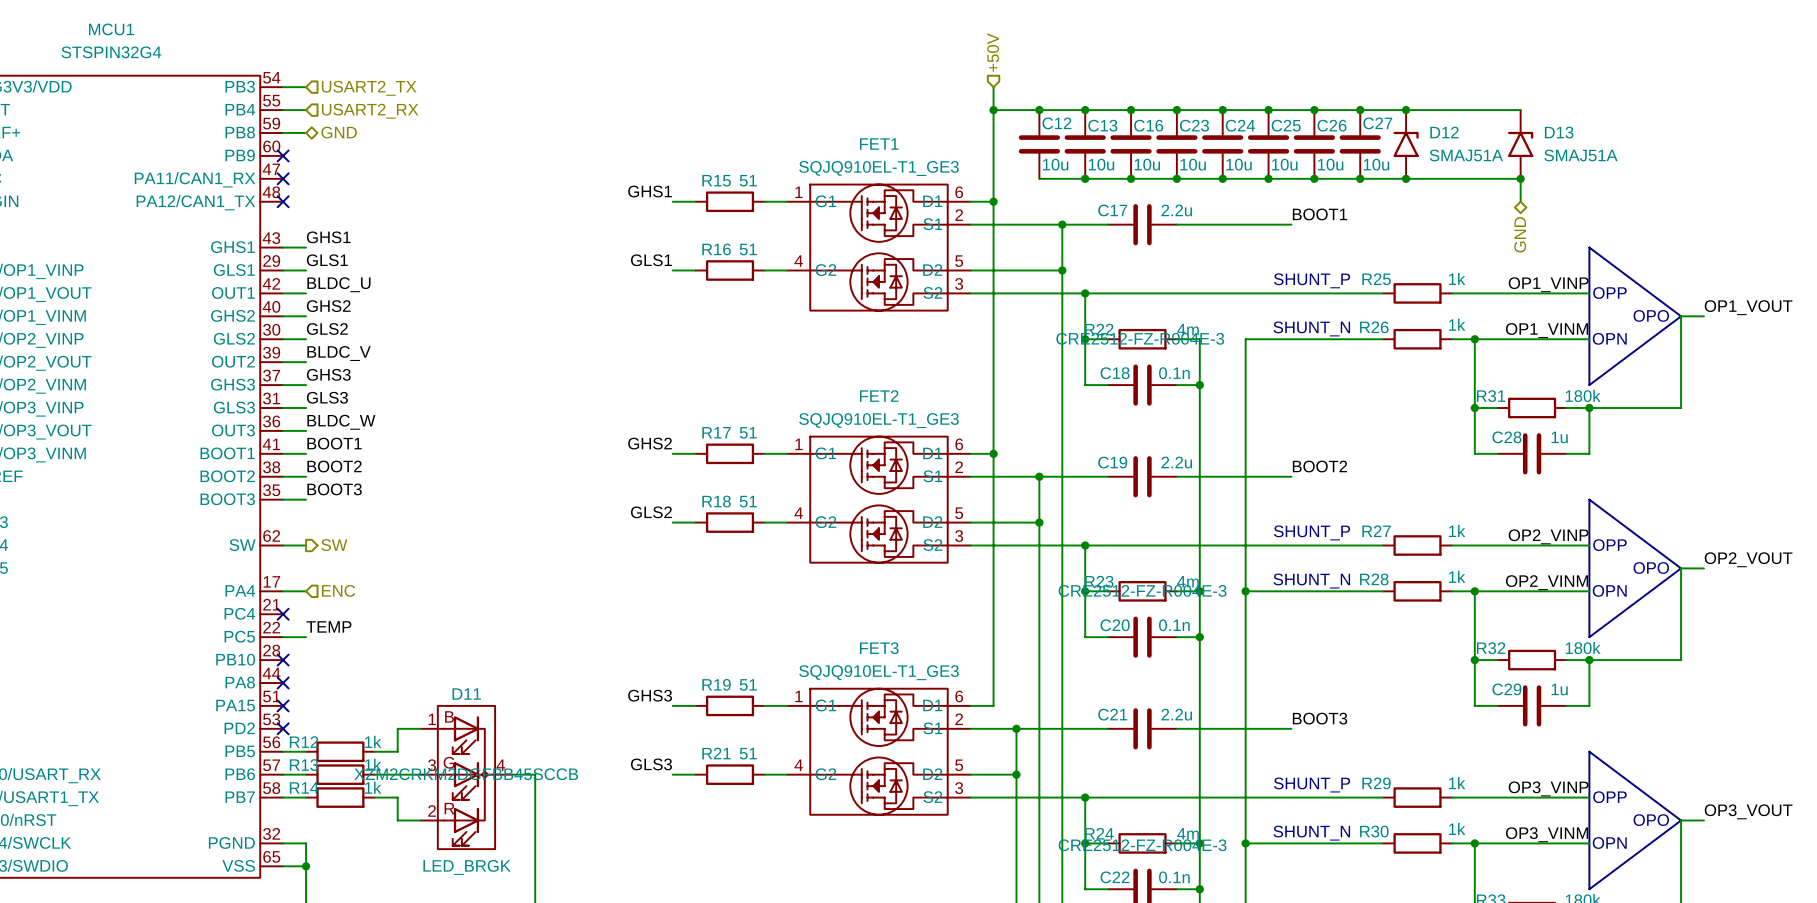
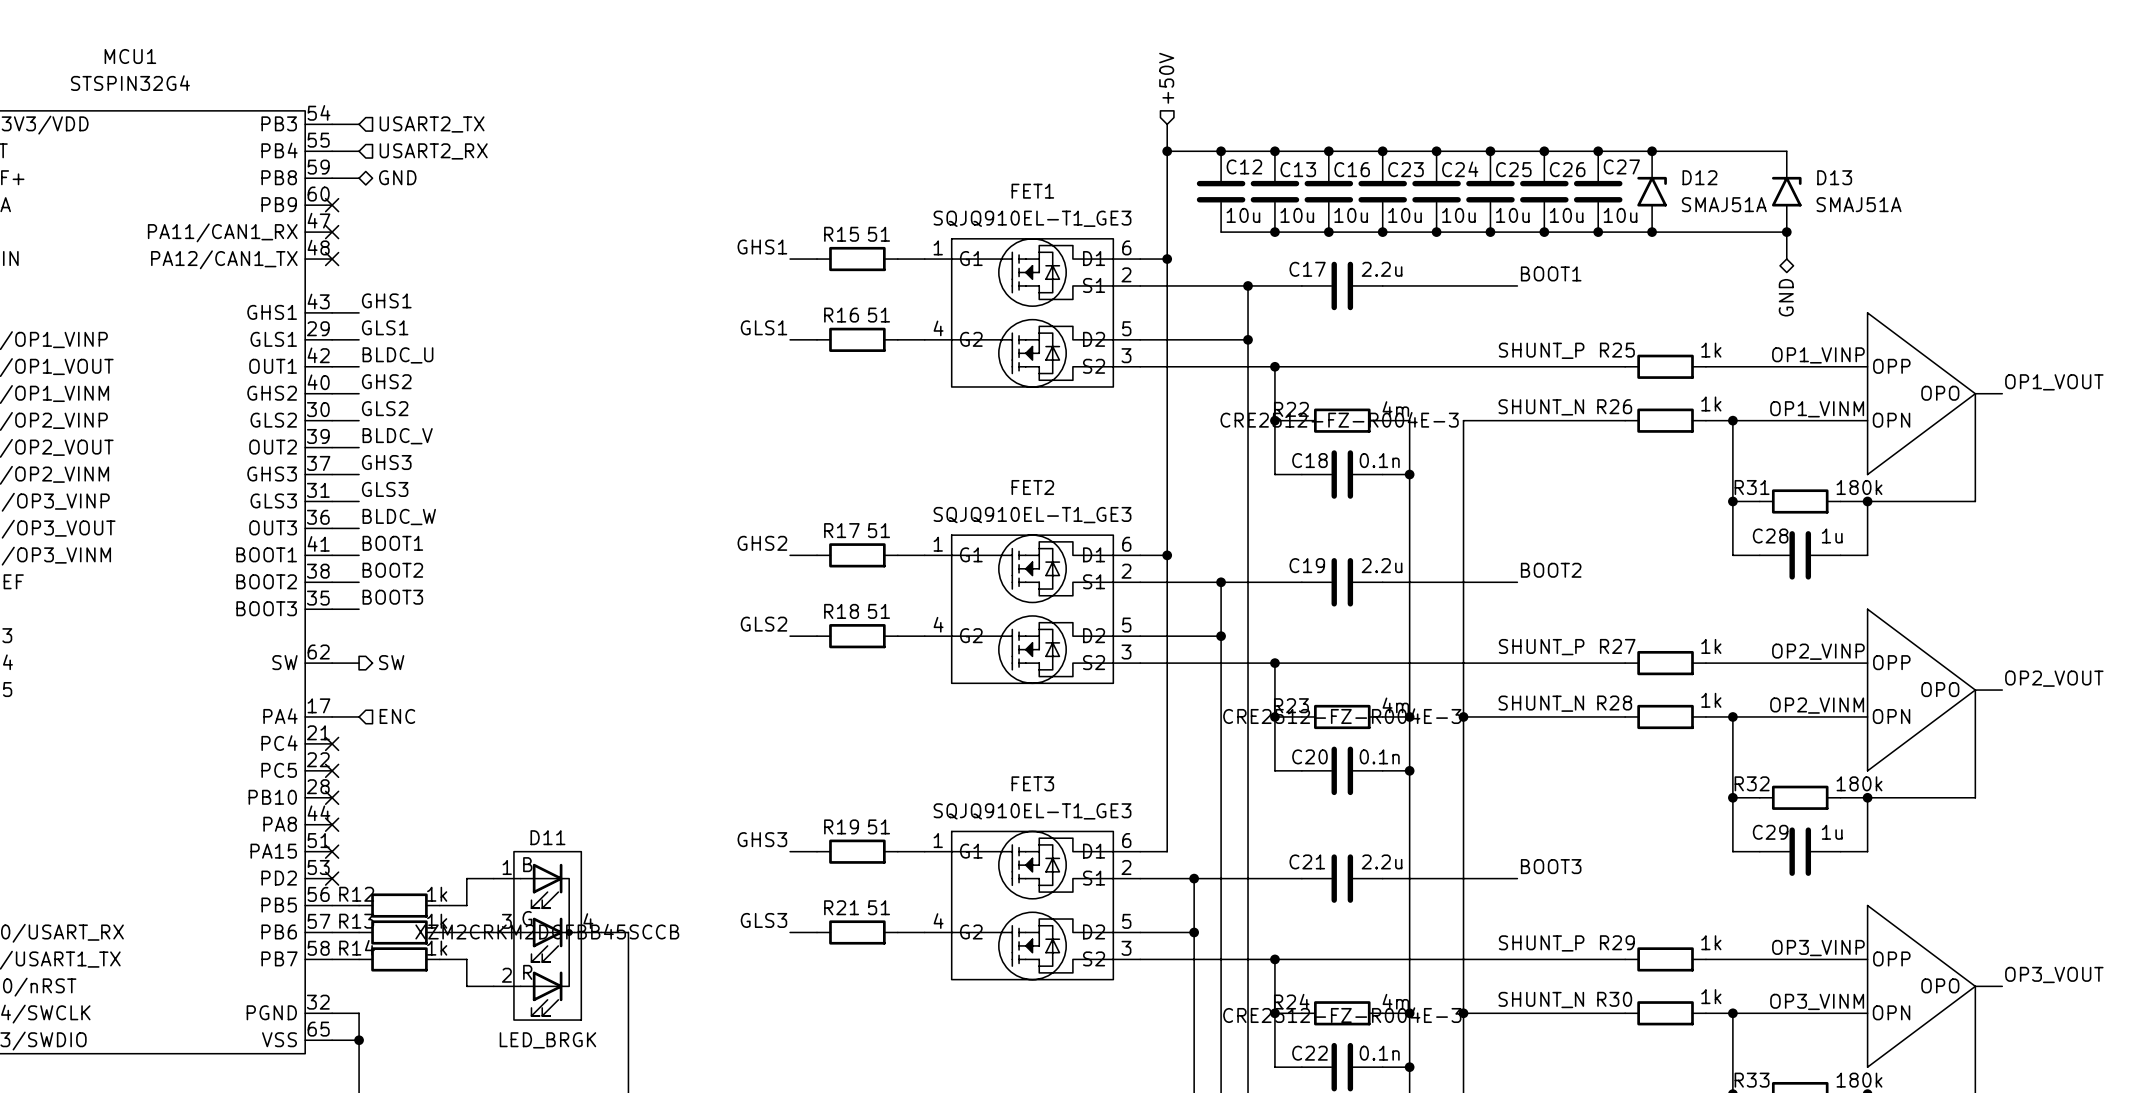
label: TEMP (328, 626) -> none
wire: (283, 637) (306, 637) -> none
no-connect mark: none -> (332, 770)

